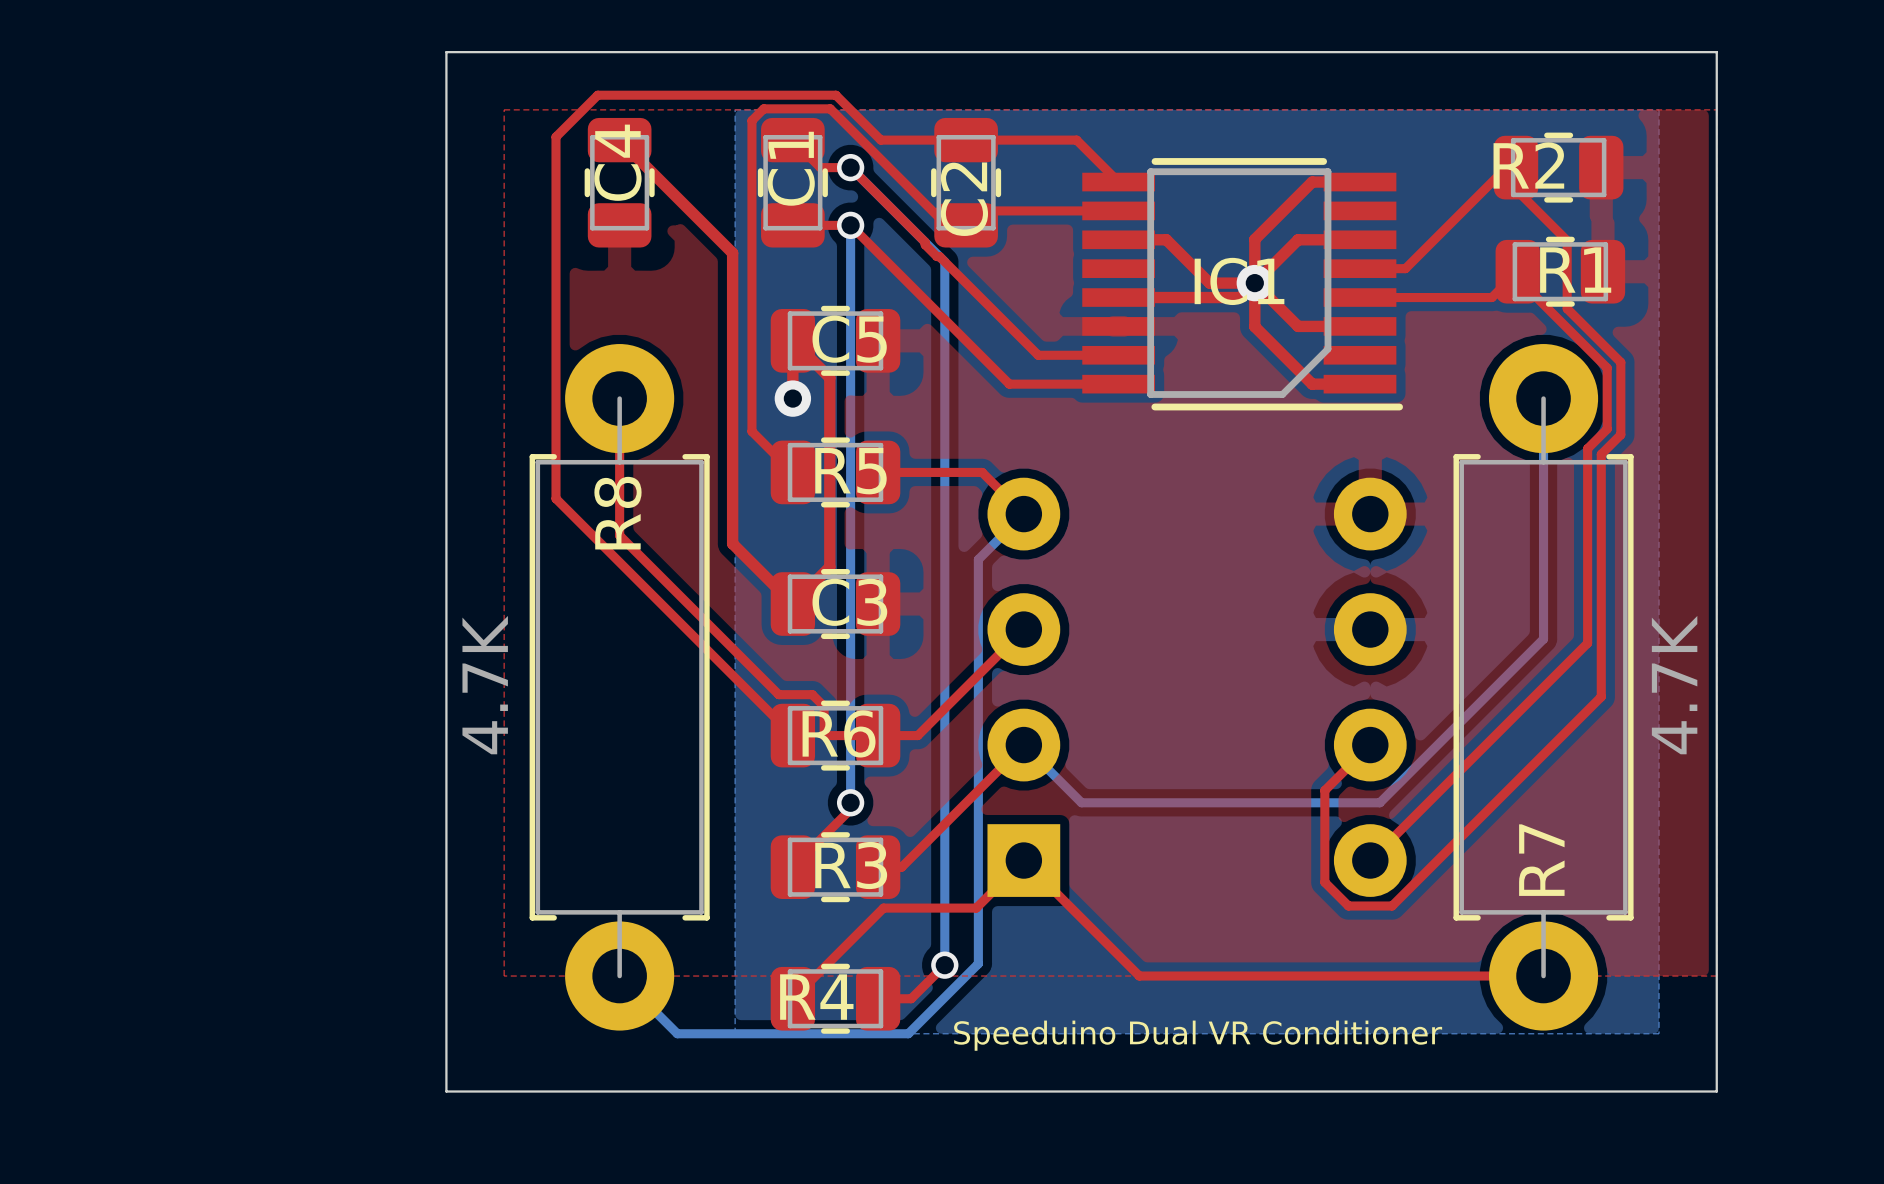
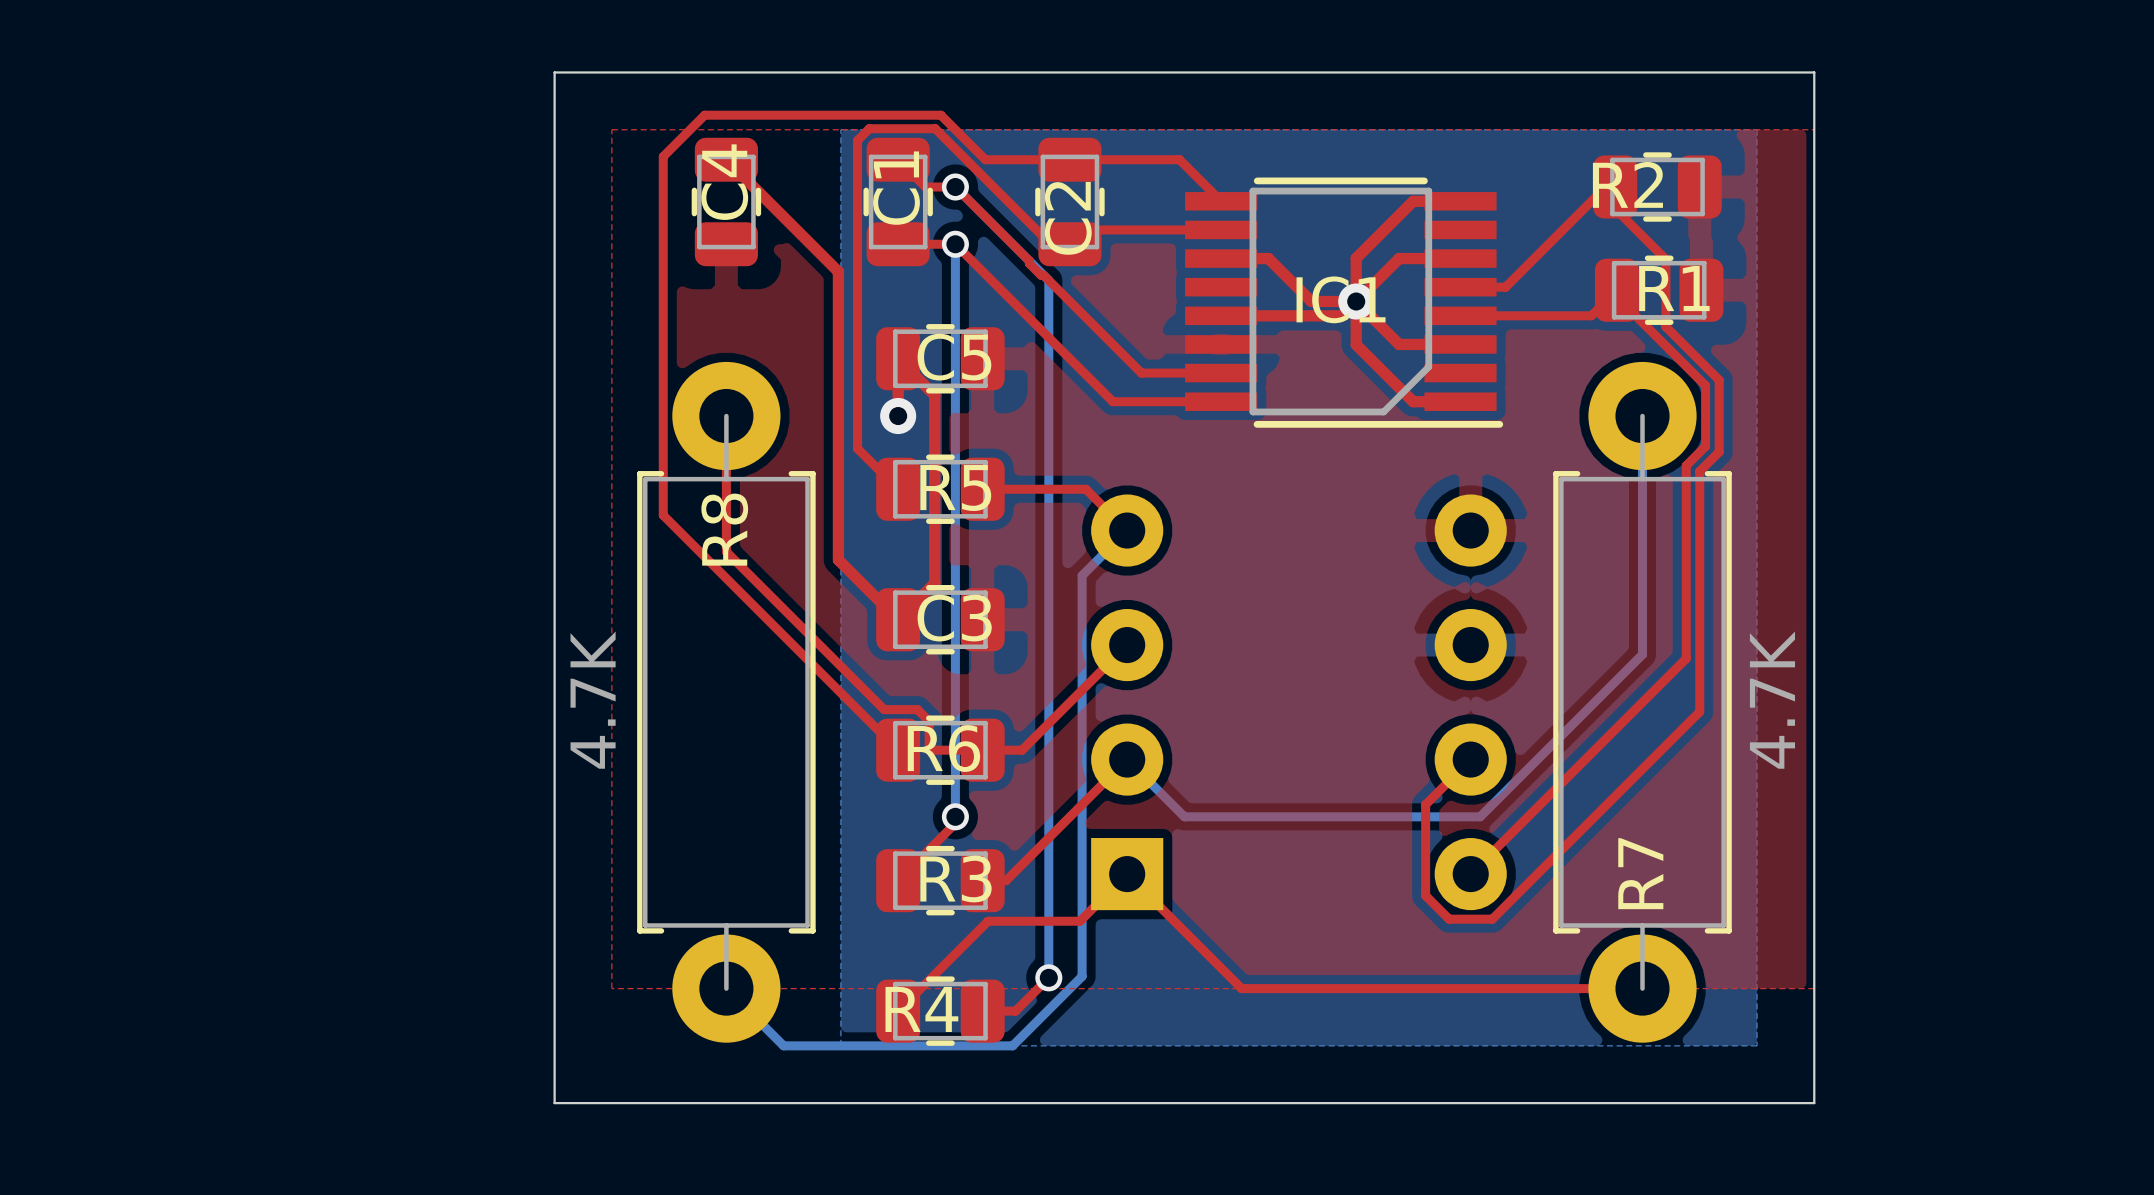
text: Speeduino Dual VR Conditioner (1198, 1035) -> none

